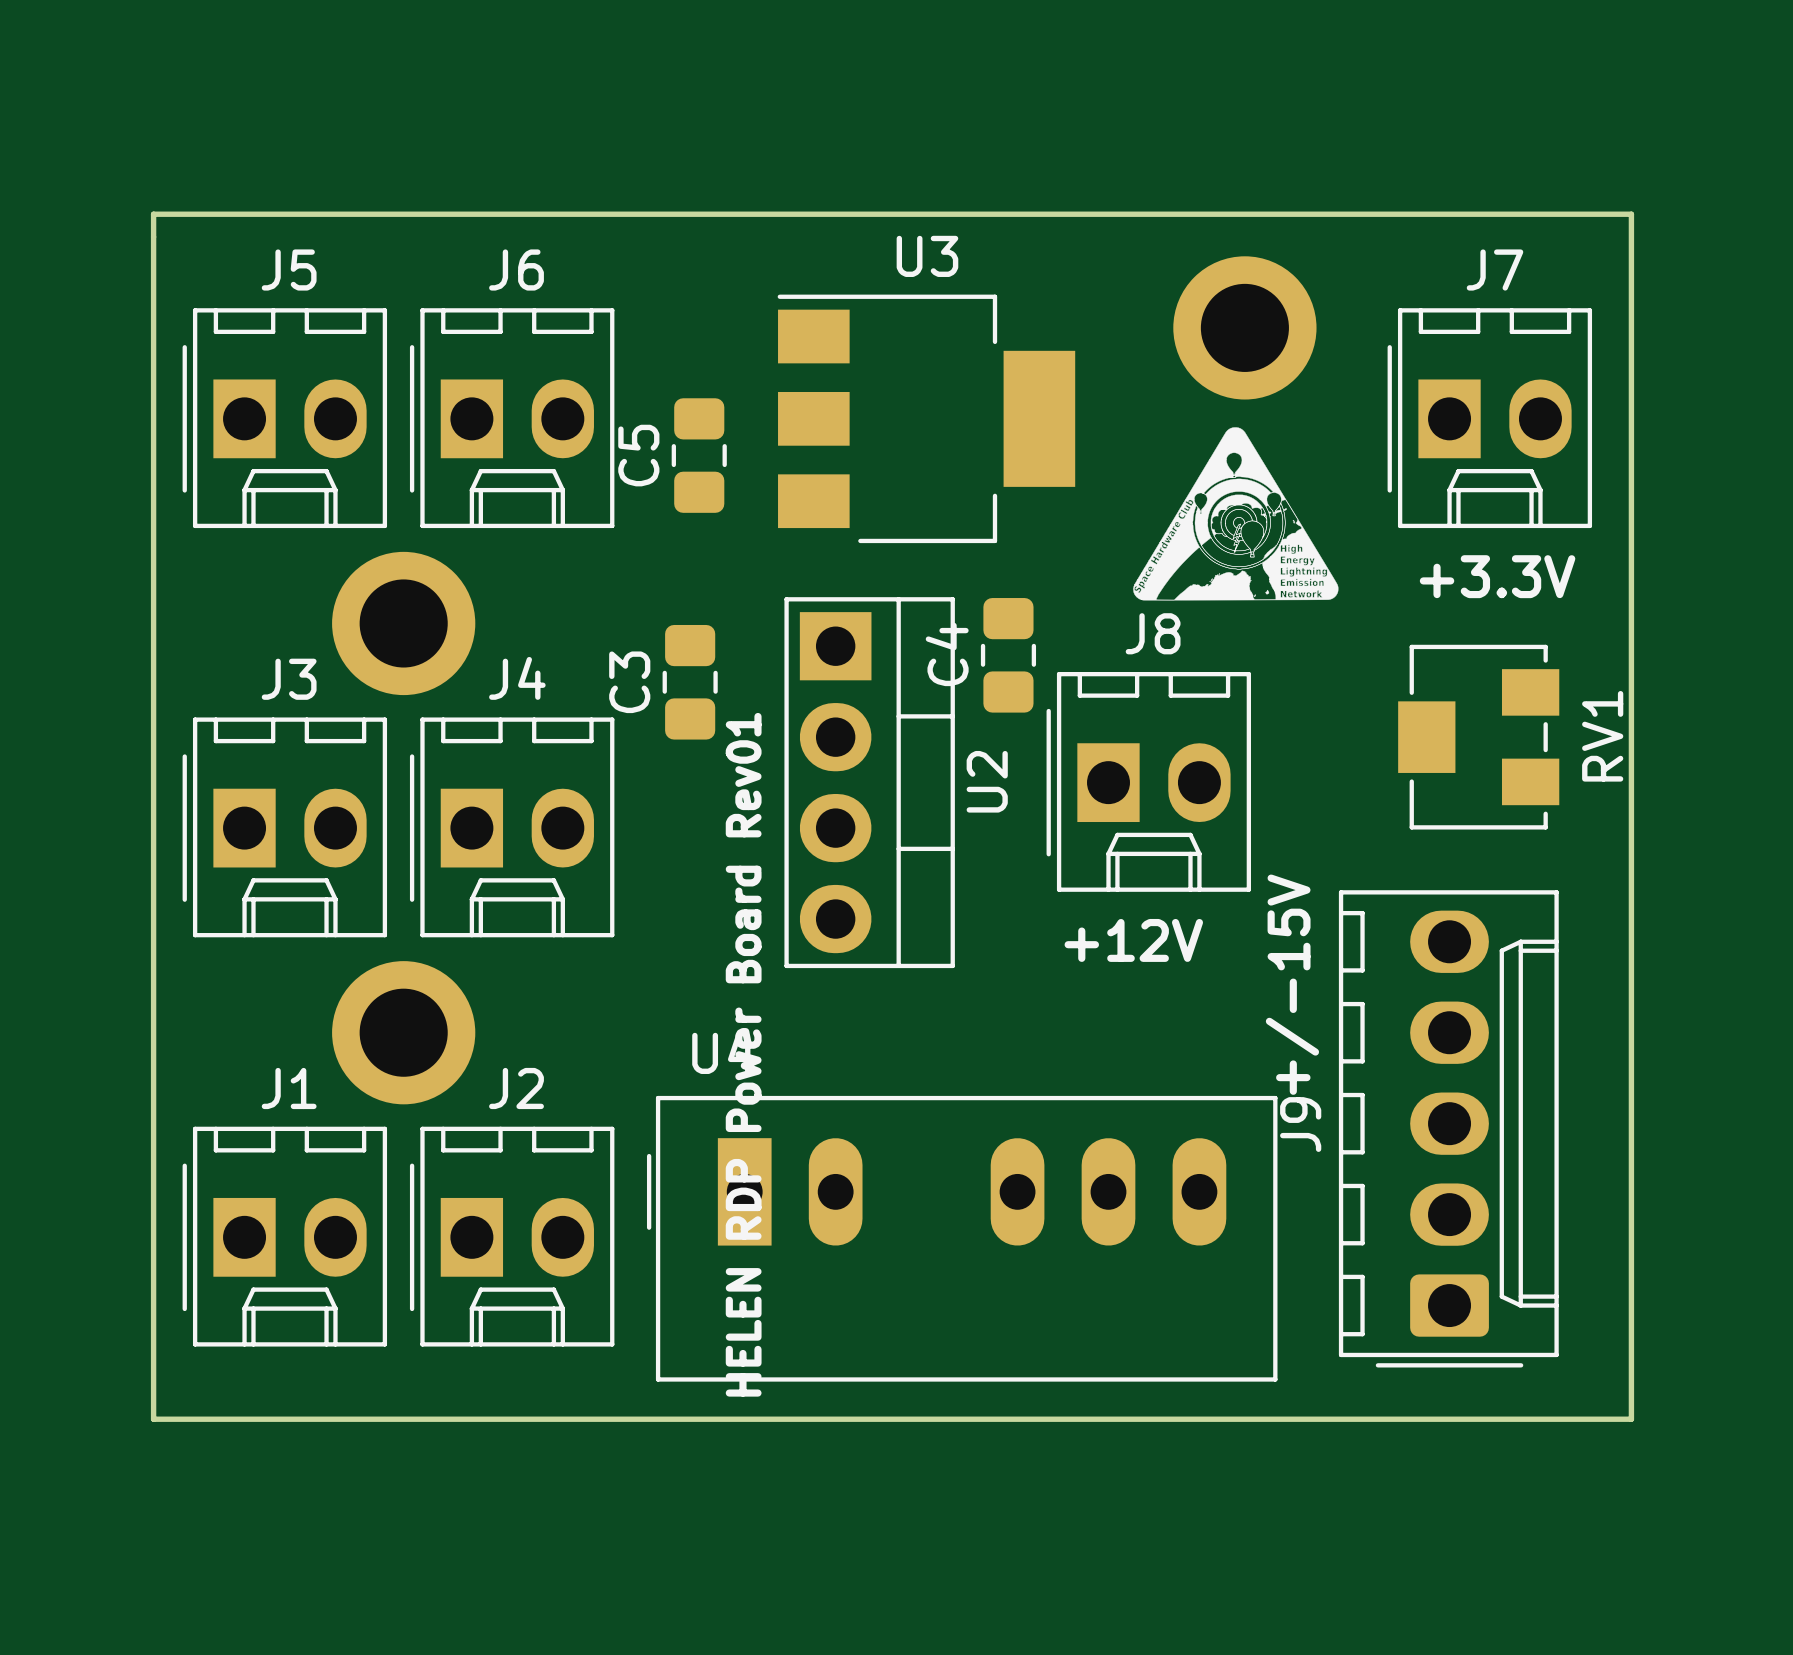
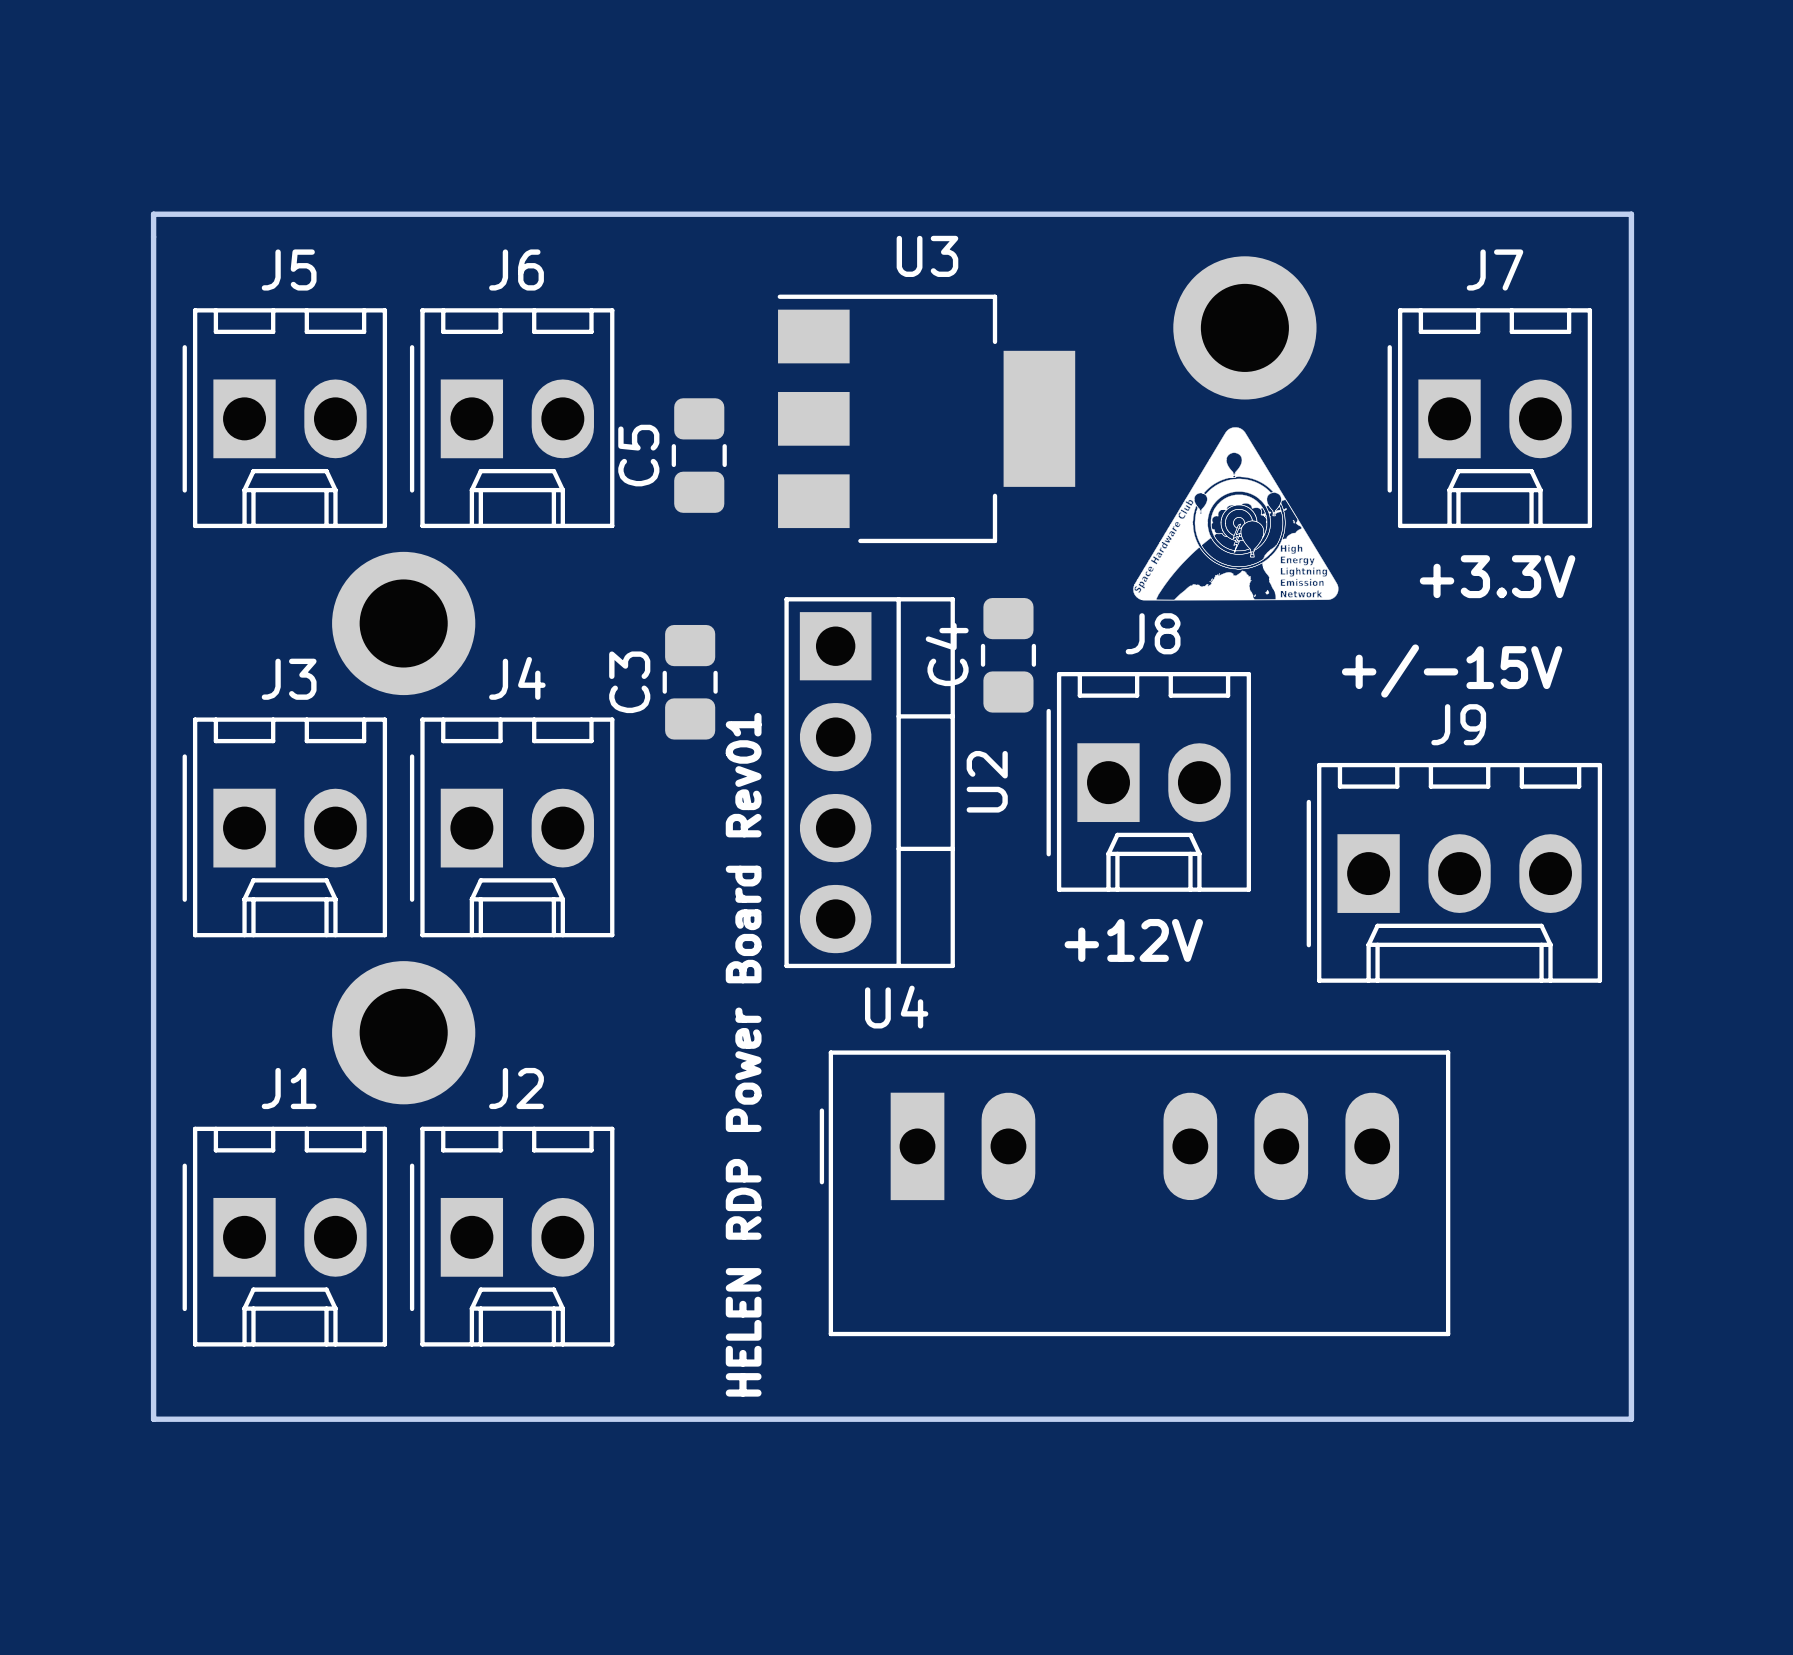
RV1: (1478, 737) -> none
J9 footprint: [1338, 890, 1559, 1368] -> [1306, 762, 1603, 983]
text rotation: 0° (1292, 984) -> 90° clockwise (1452, 671)
text position: +/-15V (1292, 984) -> +/-15V (1452, 671)
J9 name position: J9 (1300, 1124) -> J9 (1458, 724)
U4 position: (962, 1238) -> (1135, 1193)

